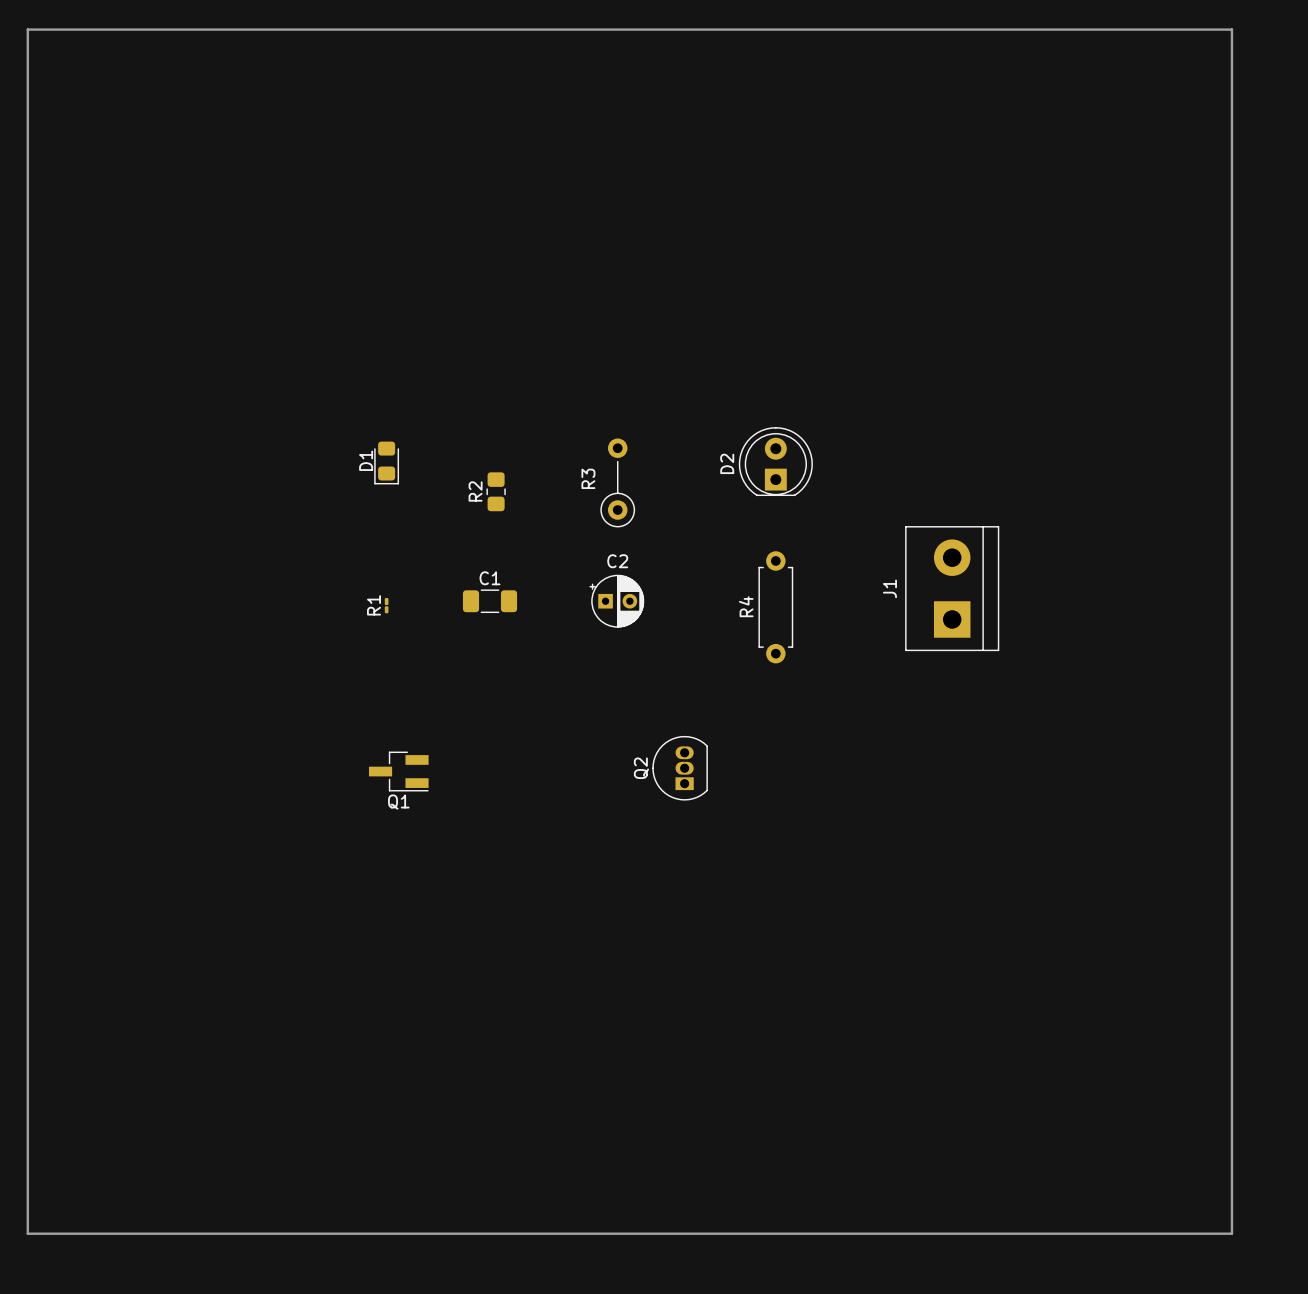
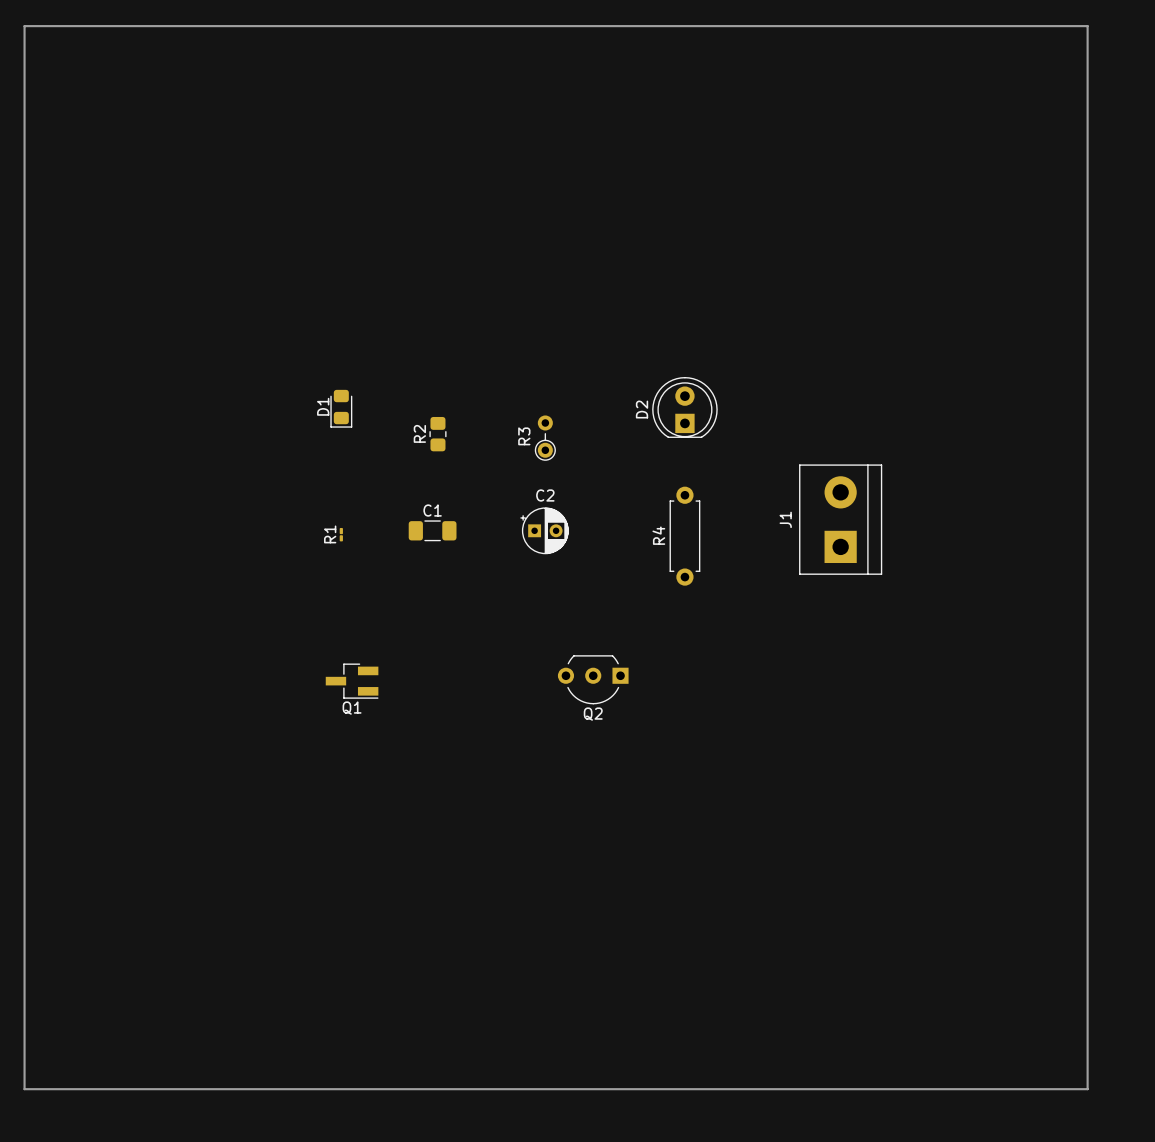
R3 footprint: [600, 438, 636, 528] -> [534, 415, 556, 461]
Q2 footprint: [652, 735, 708, 801] -> [557, 655, 629, 705]
Q2 name position: Q2 (641, 768) -> Q2 (593, 714)

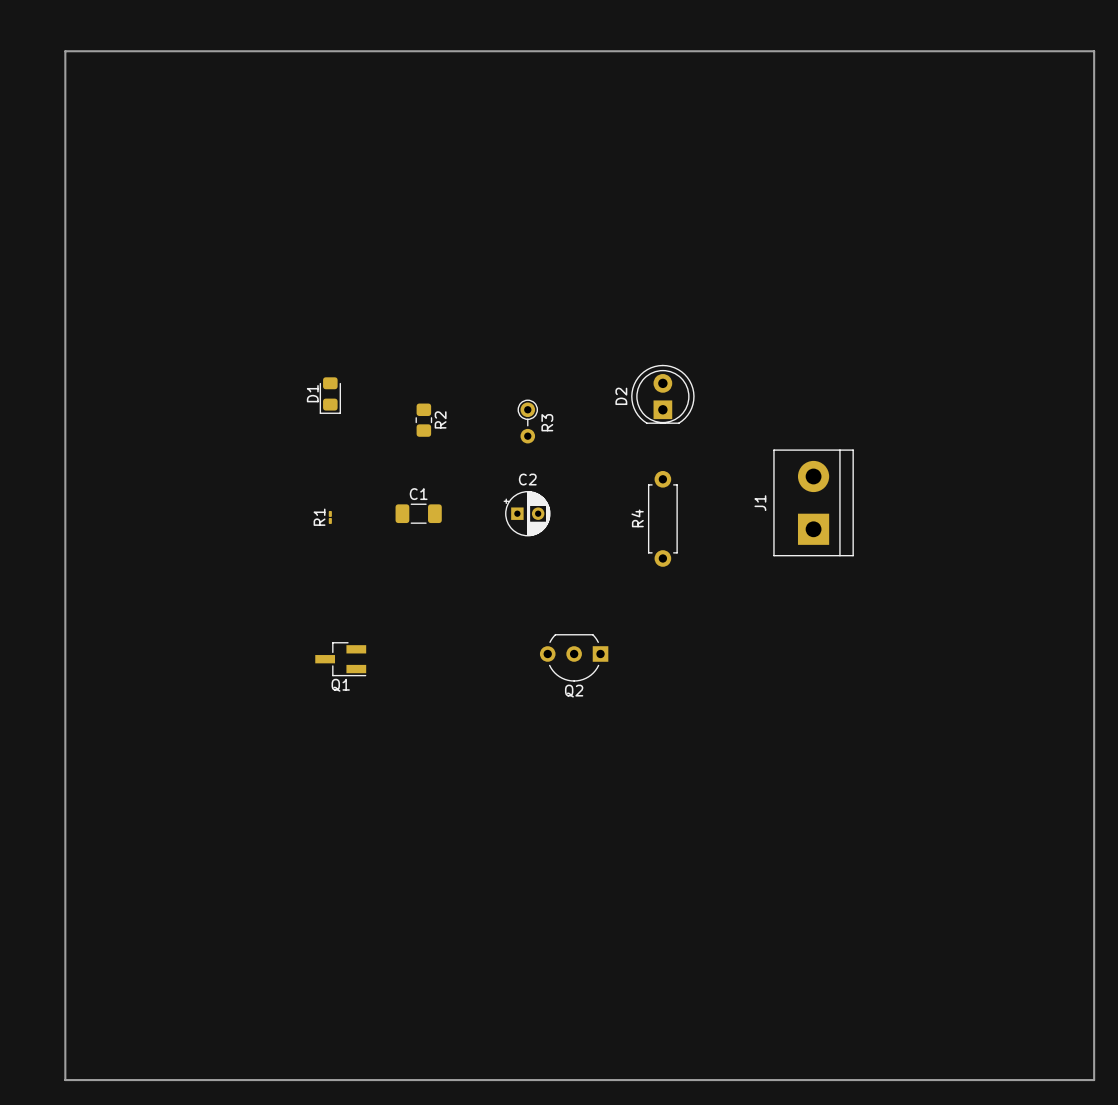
board edge: (24, 26) (1087, 26) (1087, 1089) (24, 1089) (24, 26) -> (65, 51) (65, 1080) (1094, 1080) (1094, 51) (65, 51)
R2 name position: R2 (419, 433) -> R2 (440, 419)
R3 rotation: 0° (545, 438) -> 180° (527, 421)

